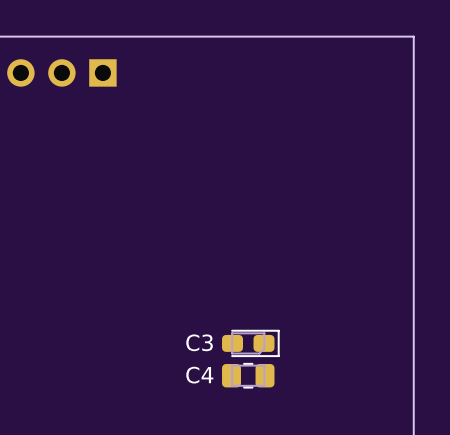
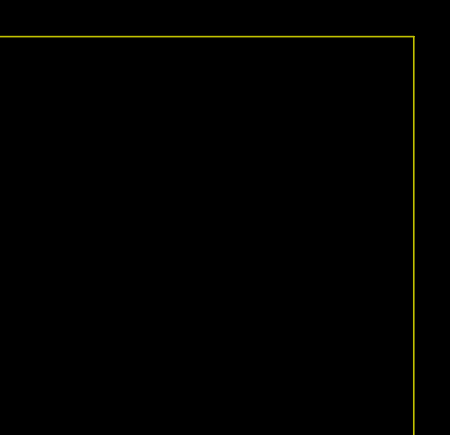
part: (61, 72) -> none
C3: (250, 343) -> none
C4: (248, 375) -> none

